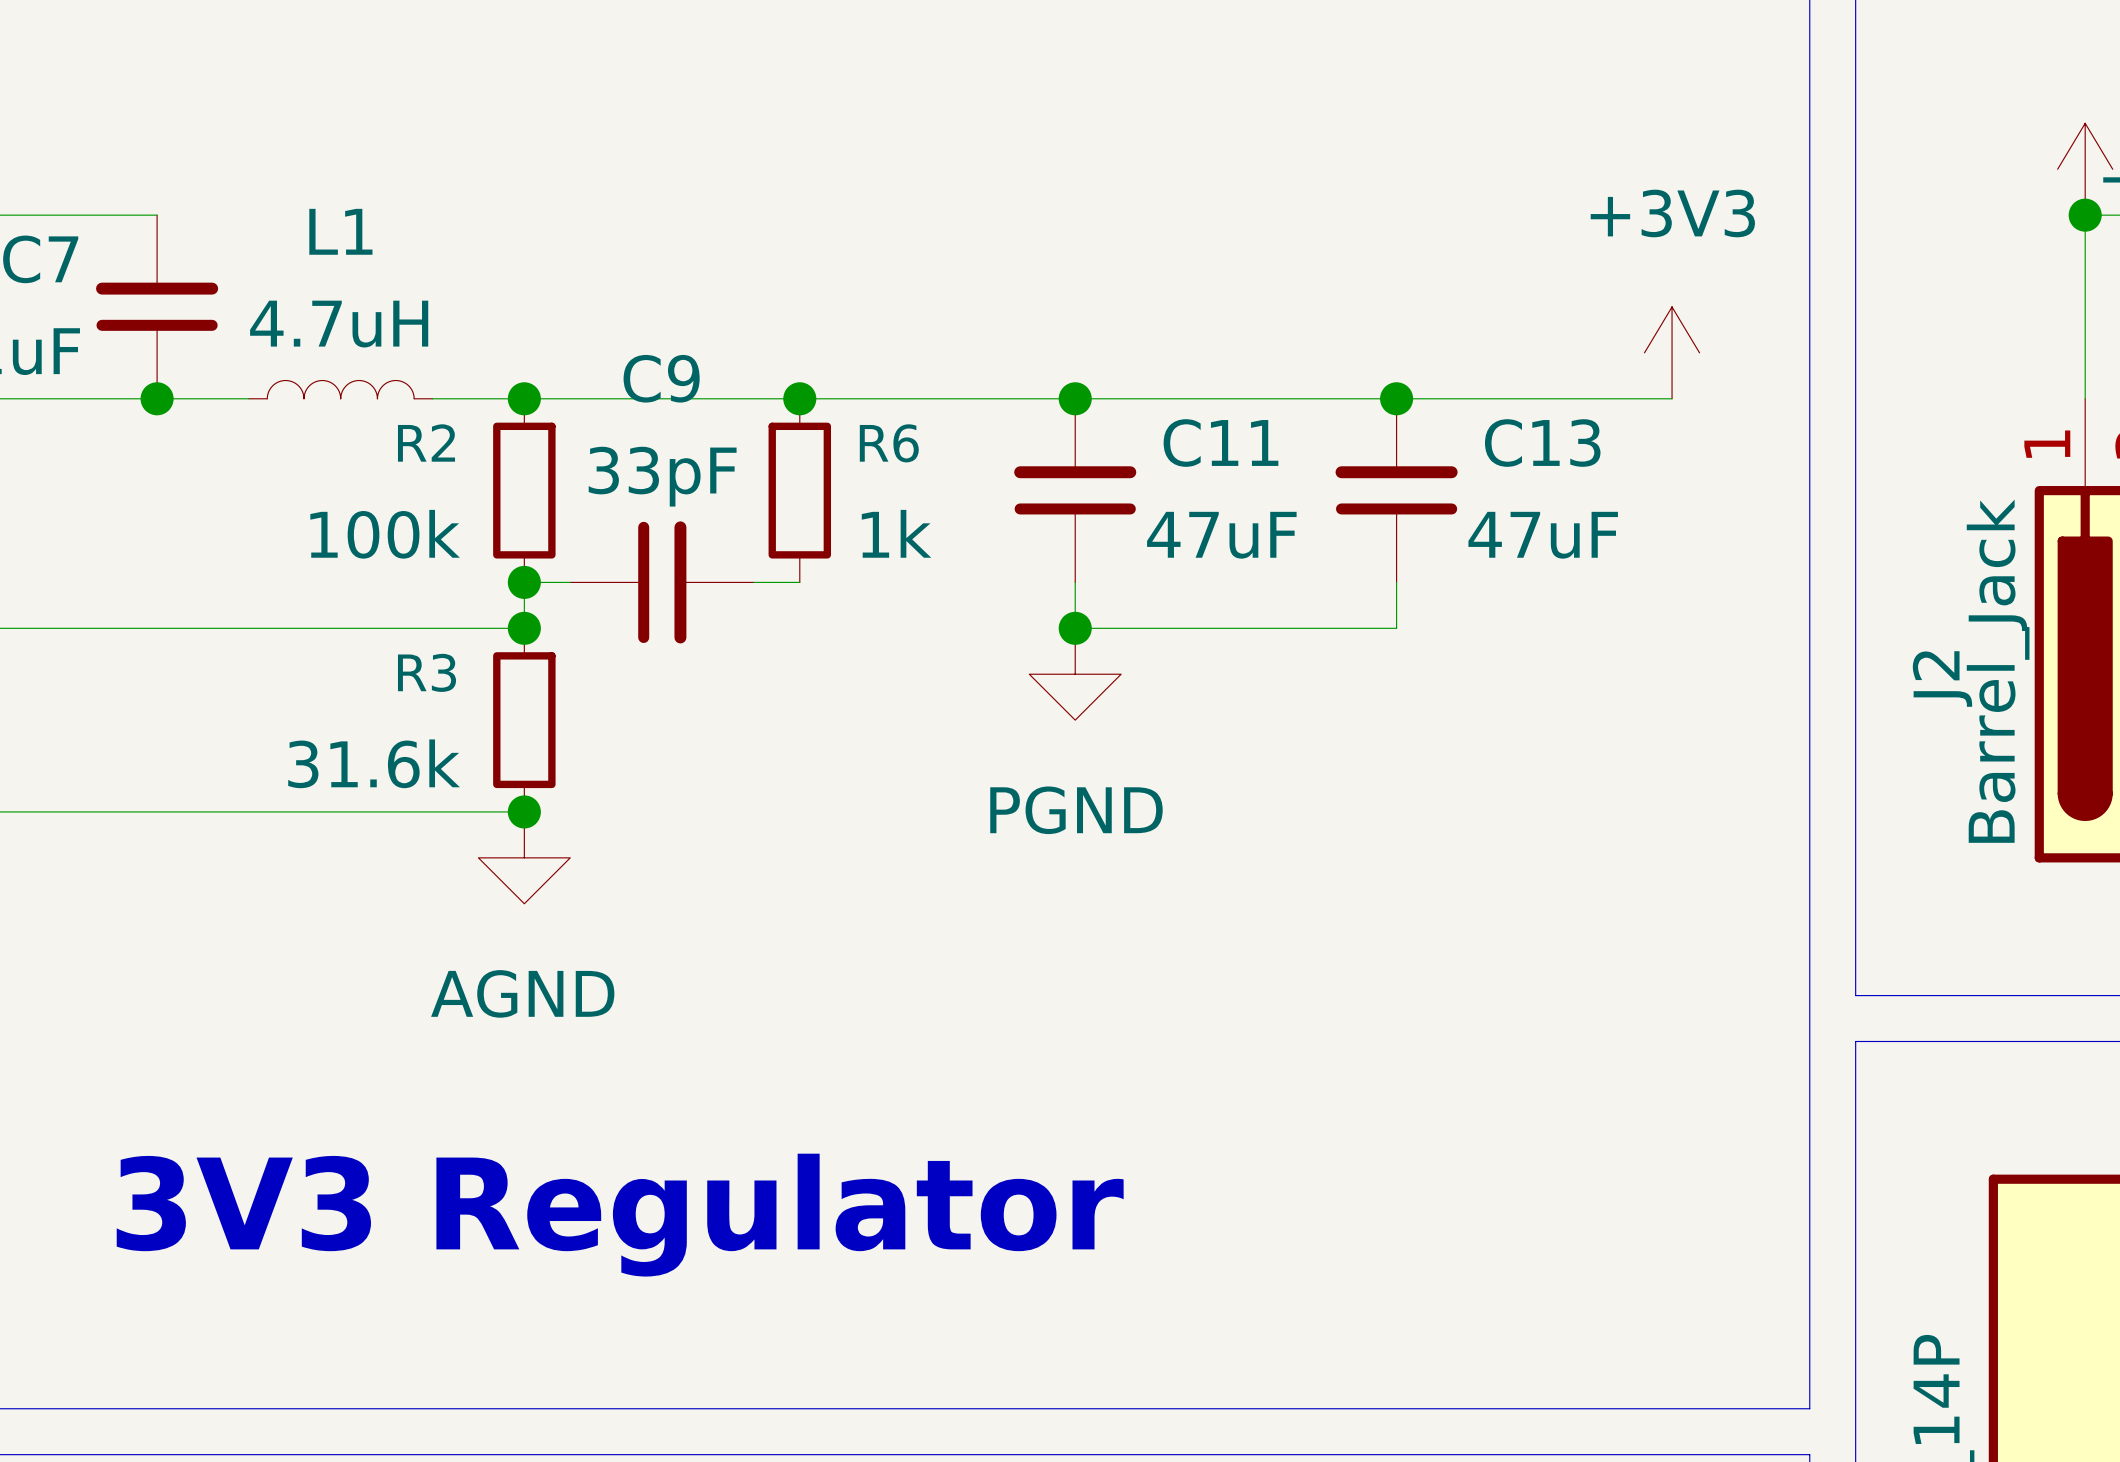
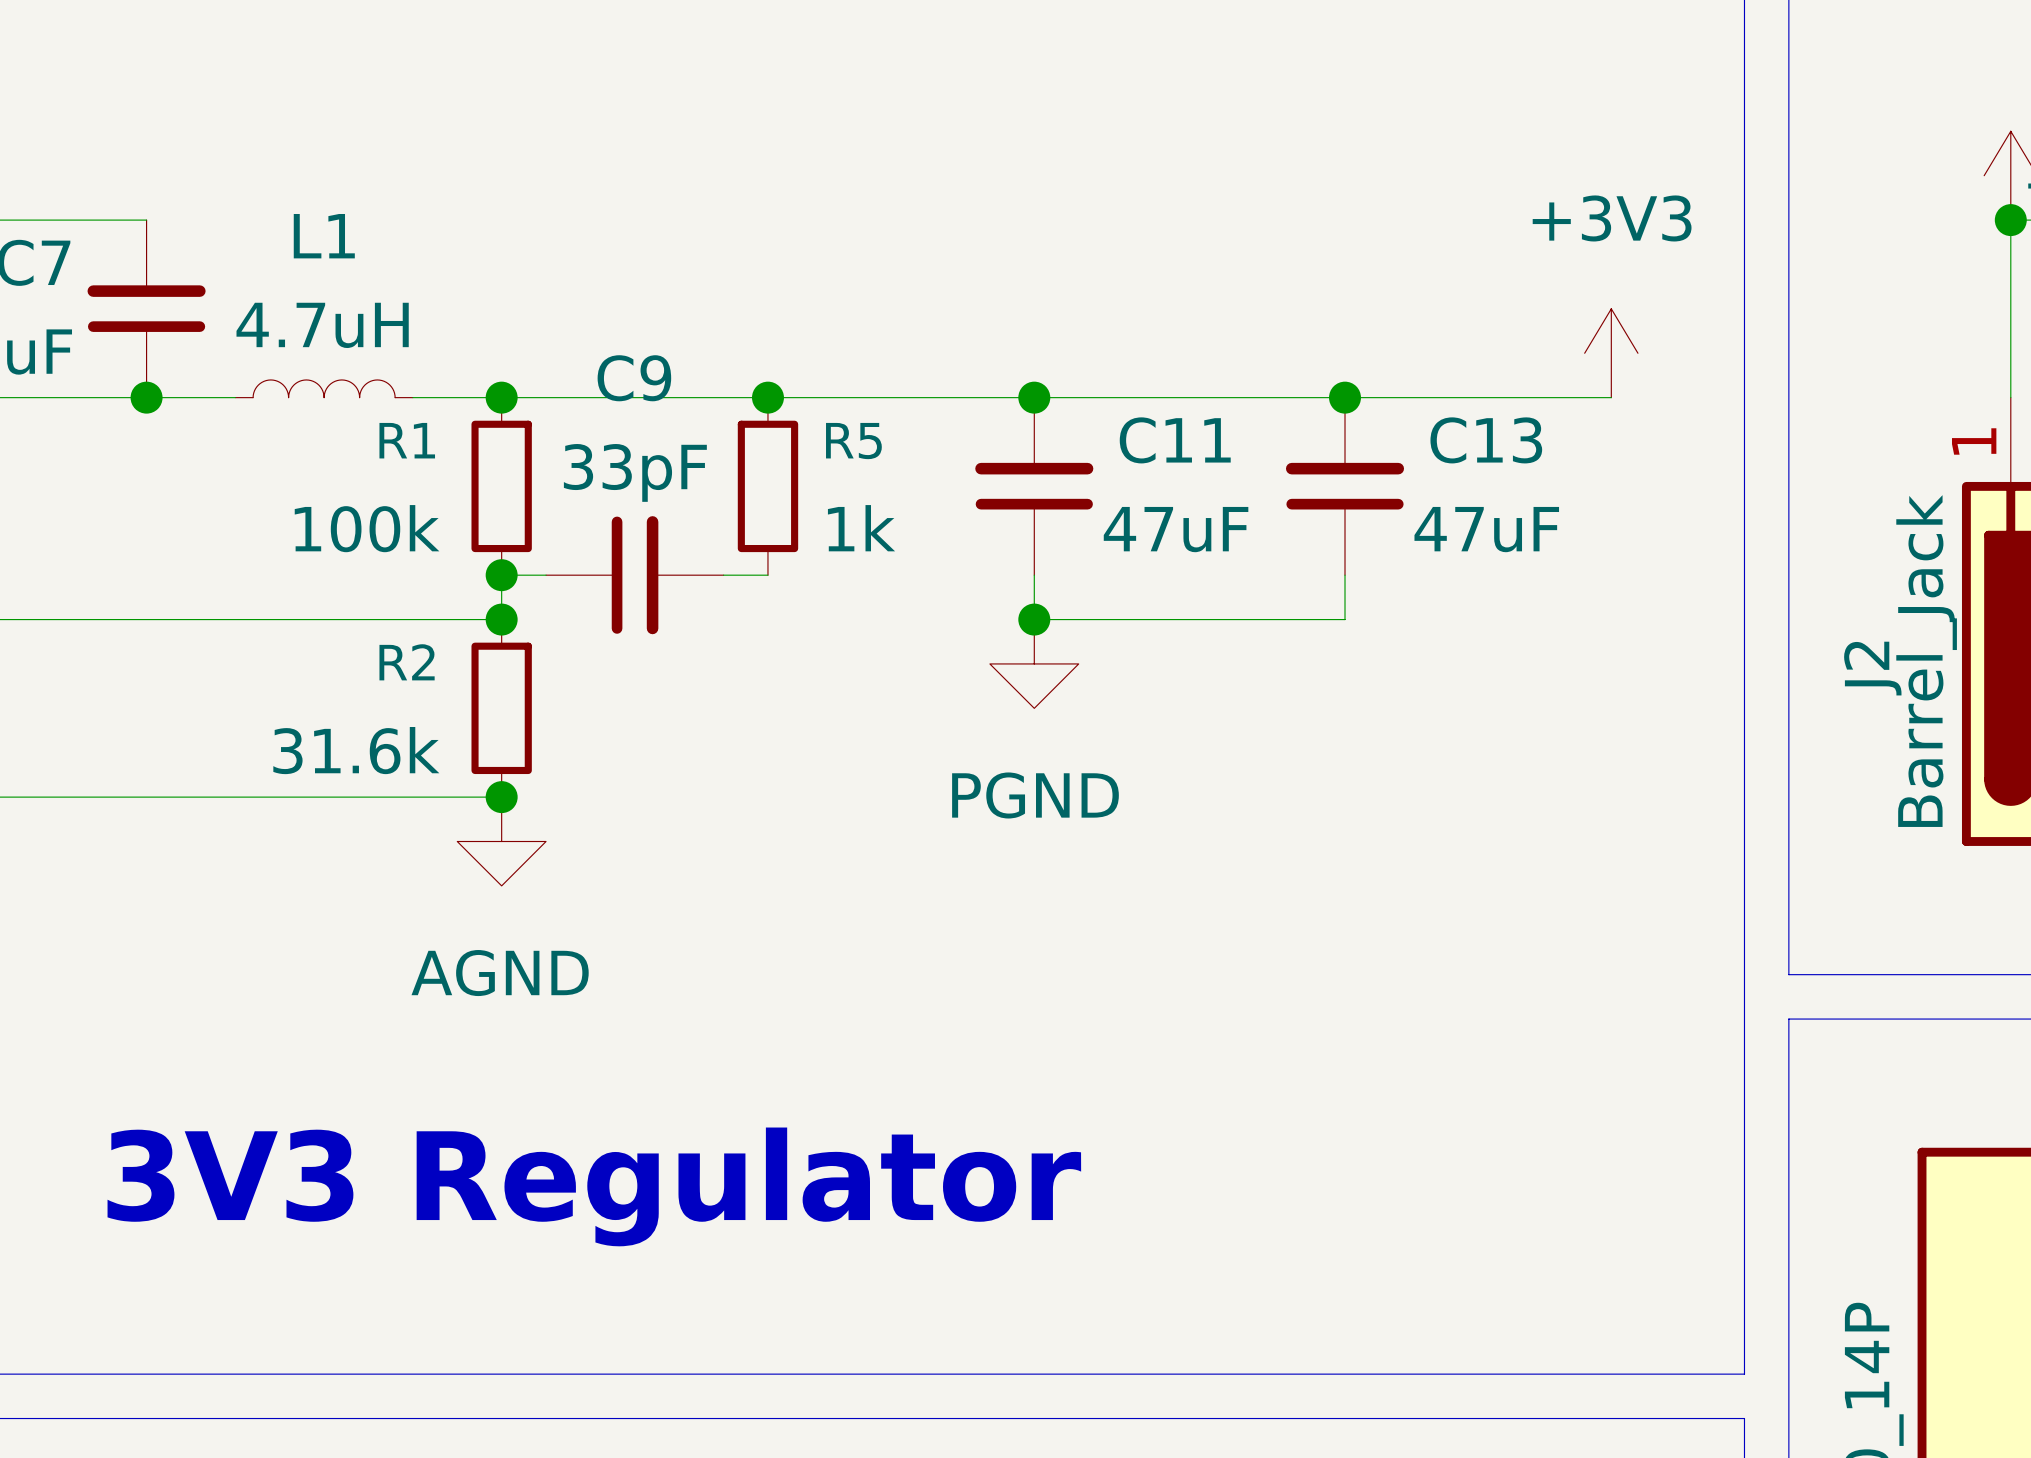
R2 name: R2 (426, 442) -> R1 (407, 440)
R6 name: R6 (889, 443) -> R5 (853, 441)
R3 name: R3 (427, 672) -> R2 (407, 662)

